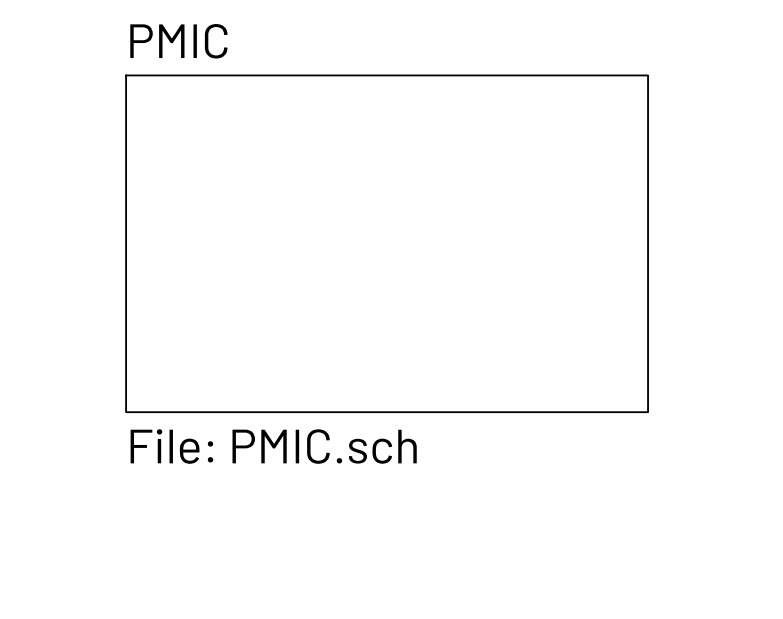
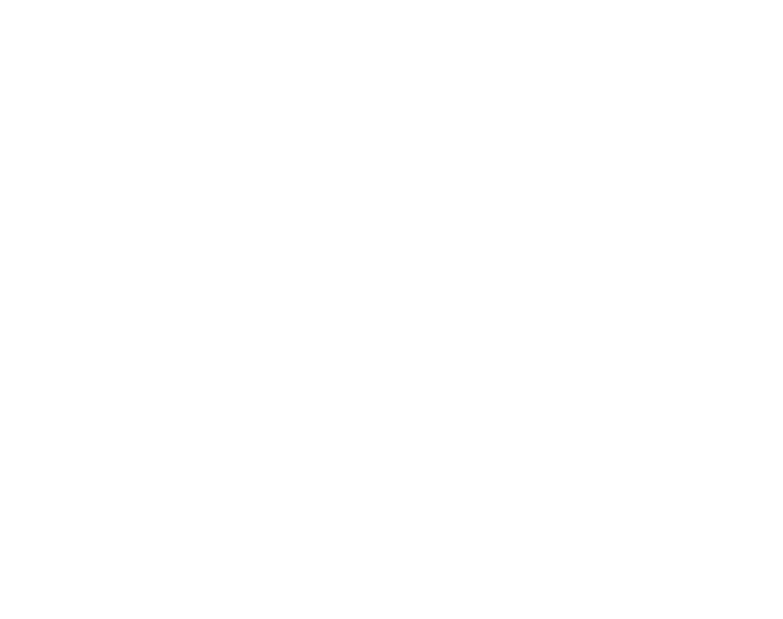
sheet PMIC: File: PMIC.sch (387, 243) -> none

